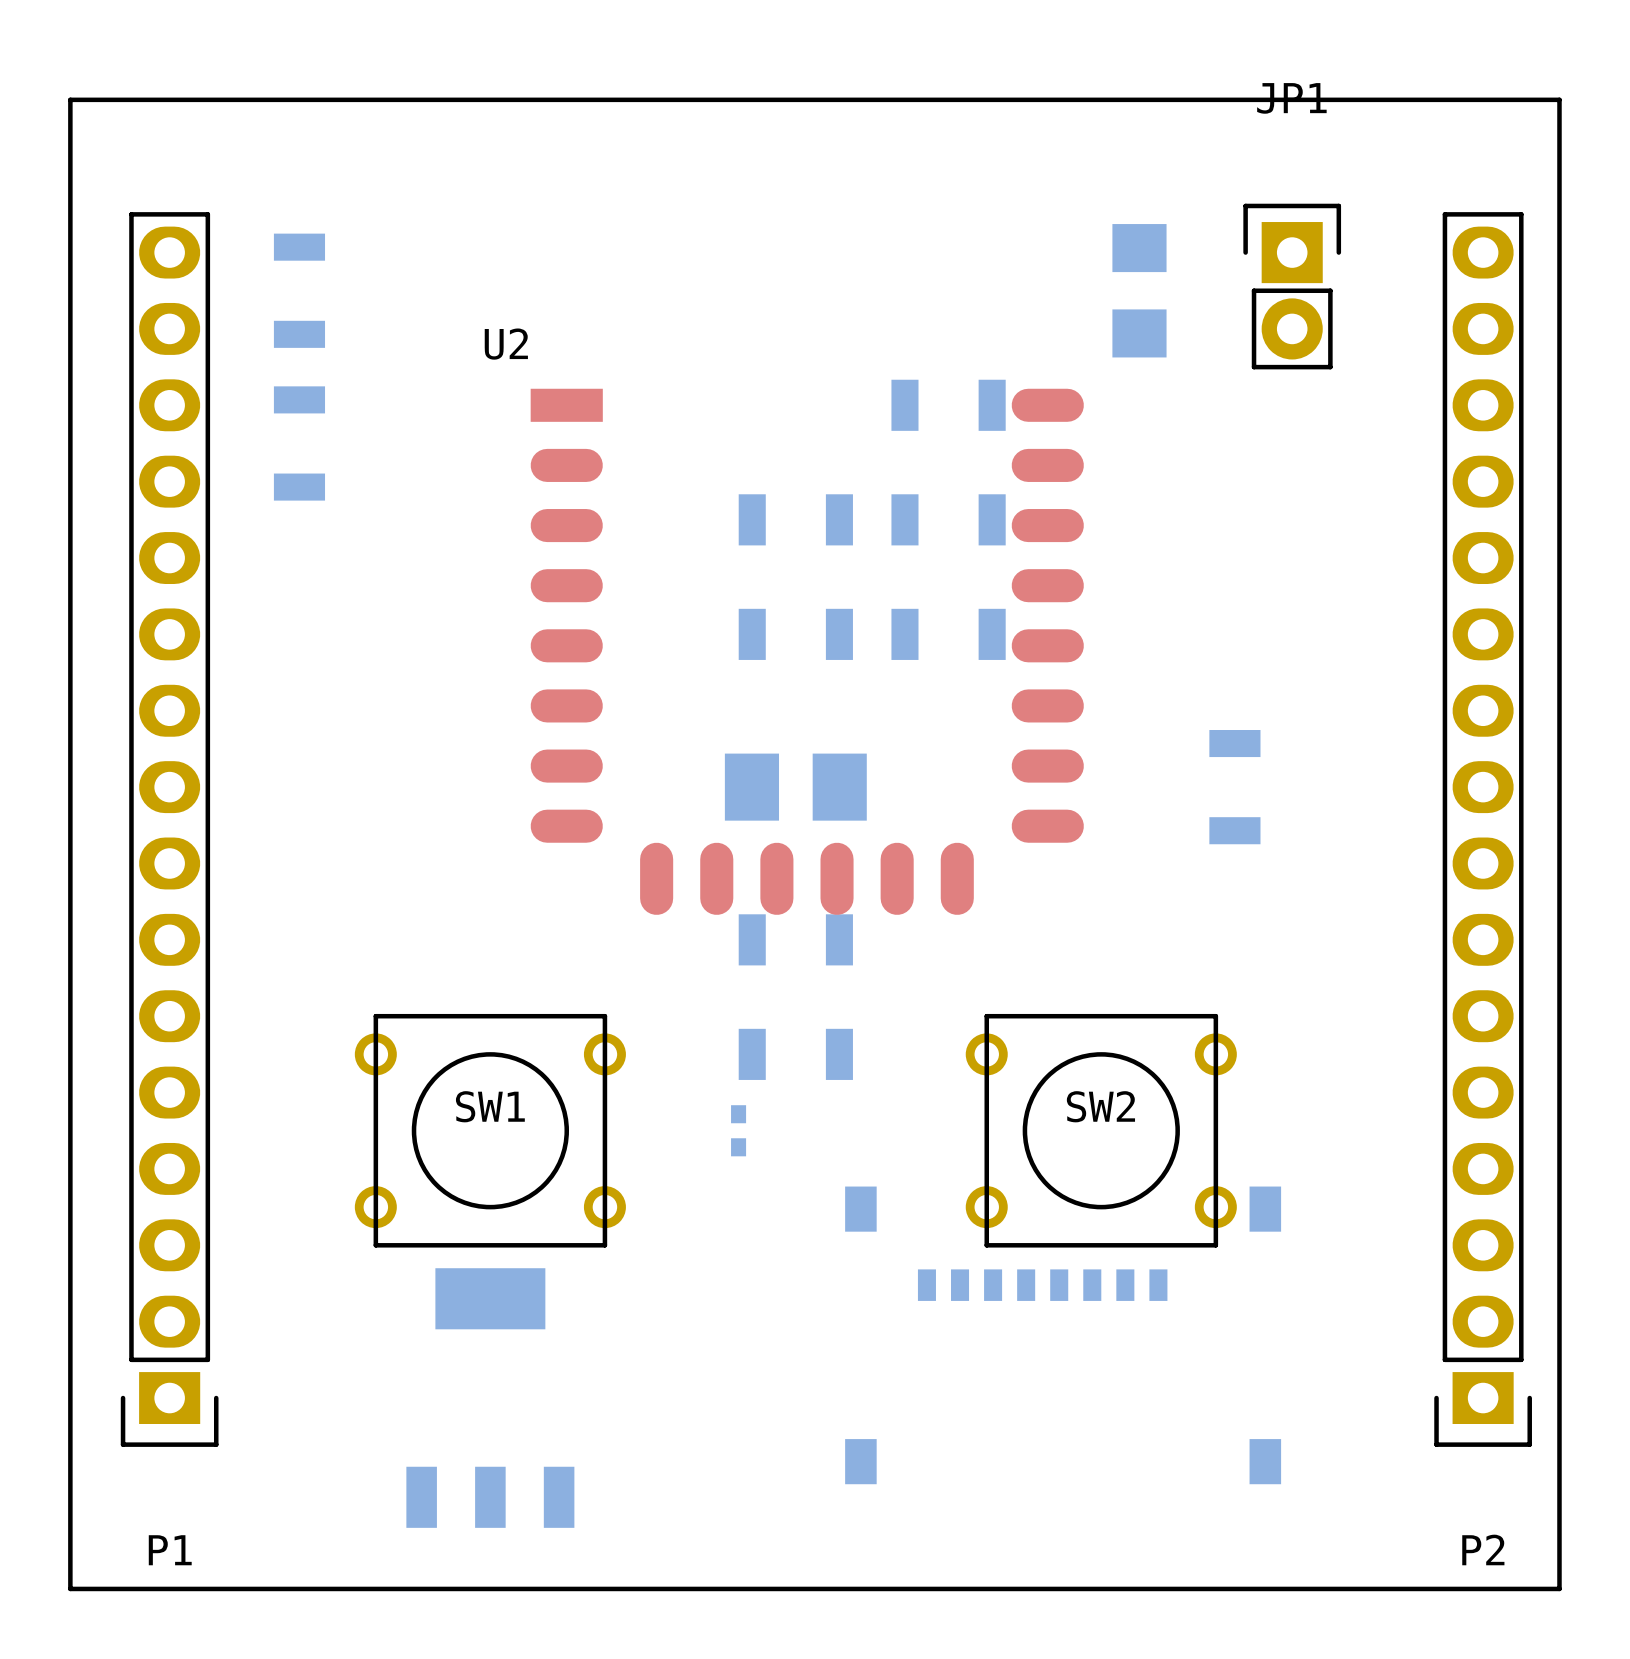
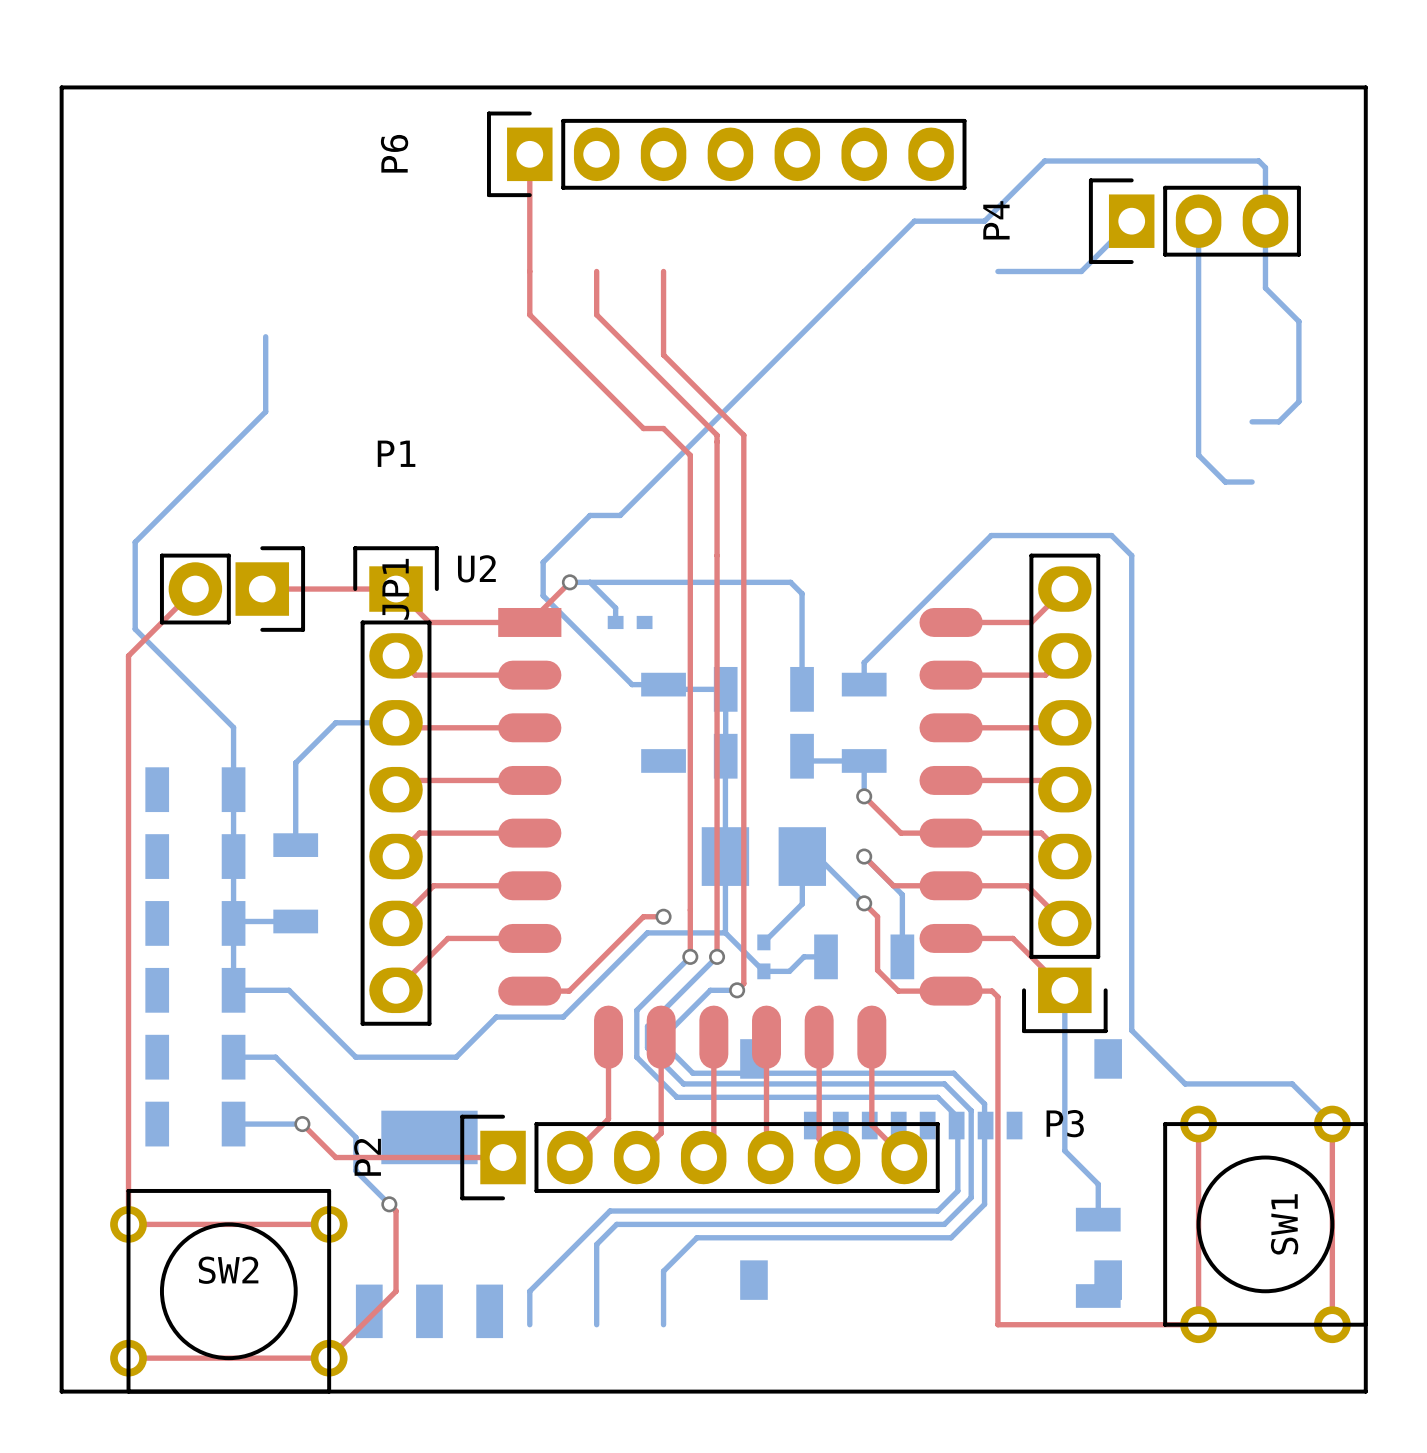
top track: none -> (529, 154) (529, 314) (643, 428) (663, 428) (690, 455) (690, 956)
P6: none -> (726, 154)
P1 footprint: [120, 212, 219, 1447] -> [353, 546, 439, 1026]
P2 footprint: [1434, 212, 1532, 1447] -> [460, 1114, 940, 1201]
bottom track: none -> (1131, 221) (1081, 271) (997, 271)
P4: none -> (1194, 221)
bottom track: none -> (1198, 221) (1198, 455) (1225, 482) (1252, 482)
JP1 rotation: 0° (1292, 286) -> 90° clockwise (232, 589)
JP1 position: (1292, 286) -> (232, 589)
part: (299, 290) -> none
part: (1139, 290) -> none
top track: none -> (596, 271) (596, 314) (717, 435) (717, 956)
top track: none -> (663, 271) (663, 354) (743, 435) (743, 983) (737, 990)
bottom track: none -> (265, 336) (265, 411) (135, 542) (135, 629) (233, 727) (233, 990) (289, 990) (355, 1057) (456, 1057) (496, 1017) (563, 1017) (647, 932) (725, 932)
part: (948, 405) -> none
part: (299, 443) -> none
bottom track: none -> (1252, 421) (1278, 421) (1298, 401) (1298, 321) (1265, 288) (1265, 167) (1258, 161) (1044, 161) (984, 221) (914, 221) (620, 515) (589, 515) (543, 562) (543, 595) (632, 684) (663, 684) (668, 689) (725, 689) (725, 756)
part: (795, 519) -> none
part: (948, 519) -> none
part: (795, 634) -> none
part: (948, 634) -> none
U2 position: (807, 651) -> (740, 838)
bottom track: none -> (569, 582) (790, 582) (802, 593) (802, 689)
top track: none -> (569, 582) (529, 622) (429, 622) (396, 589) (262, 589)
via: none -> (569, 582)
bottom track: none -> (589, 582) (615, 607) (615, 622)
top track: none -> (195, 589) (128, 655) (128, 1224) (329, 1224)
top track: none -> (1064, 589) (1031, 622) (951, 622)
part: none -> (630, 622)
top track: none -> (396, 655) (415, 675) (529, 675)
top track: none -> (1064, 655) (1045, 675) (951, 675)
bottom track: none -> (864, 684) (864, 662) (991, 535) (1111, 535) (1131, 555) (1131, 1030) (1185, 1083) (1292, 1083) (1332, 1124)
part position: (795, 787) -> (763, 856)
part: none -> (763, 689)
part: (1234, 787) -> none
bottom track: none -> (396, 722) (335, 722) (295, 762) (295, 845)
top track: none -> (396, 722) (401, 727) (529, 727)
part: none -> (663, 722)
part: none -> (864, 722)
top track: none -> (1064, 722) (1059, 727) (951, 727)
bottom track: none -> (725, 756) (725, 932)
part: none -> (763, 756)
bottom track: none -> (802, 756) (806, 760) (864, 760) (864, 796)
top track: none -> (529, 780) (405, 780) (396, 789)
top track: none -> (951, 780) (1055, 780) (1064, 789)
part: none -> (195, 789)
P3: none -> (1064, 793)
top track: none -> (864, 796) (900, 833) (1041, 833) (1064, 856)
via: none -> (864, 796)
part: (795, 939) -> none
top track: none -> (529, 833) (419, 833) (396, 856)
part: none -> (195, 856)
bottom track: none -> (864, 856) (902, 894) (902, 956)
top track: none -> (864, 856) (893, 885) (1027, 885) (1064, 923)
via: none -> (864, 856)
part: none -> (295, 883)
top track: none -> (529, 885) (433, 885) (396, 923)
bottom track: none -> (864, 903) (817, 856) (802, 856) (802, 903) (763, 942)
top track: none -> (864, 903) (877, 916) (877, 970) (898, 991) (992, 991) (997, 997) (997, 1324) (1198, 1324) (1198, 1124)
via: none -> (864, 903)
top track: none -> (663, 916) (643, 916) (569, 991) (529, 991)
via: none -> (663, 916)
bottom track: none -> (295, 921) (235, 921) (233, 923)
part: none -> (195, 923)
part: (795, 1054) -> none
bottom track: none -> (725, 932) (763, 971) (789, 971) (804, 956) (826, 956)
top track: none -> (529, 938) (447, 938) (396, 990)
top track: none -> (951, 938) (1012, 938) (1064, 990)
bottom track: none -> (690, 956) (636, 1010) (636, 1057) (676, 1097) (937, 1097) (957, 1117) (957, 1190) (937, 1211) (610, 1211) (529, 1291) (529, 1324)
via: none -> (690, 956)
bottom track: none -> (717, 956) (647, 1026) (647, 1047) (683, 1083) (944, 1083) (971, 1110) (971, 1197) (944, 1224) (616, 1224) (596, 1244) (596, 1324)
via: none -> (717, 956)
part: none -> (864, 956)
part: none -> (195, 990)
SW1 rotation: 0° (490, 1130) -> 90° clockwise (1265, 1224)
SW1 position: (490, 1130) -> (1265, 1224)
part position: (738, 1130) -> (763, 956)
bottom track: none -> (737, 990) (710, 990) (670, 1030) (670, 1050) (692, 1073) (953, 1073) (984, 1104) (984, 1204) (951, 1237) (696, 1237) (663, 1271) (663, 1324)
via: none -> (737, 990)
SW2 position: (1101, 1130) -> (228, 1291)
bottom track: none -> (1064, 990) (1064, 1150) (1098, 1184) (1098, 1219)
top track: none -> (608, 1037) (608, 1118) (569, 1157)
top track: none -> (661, 1037) (661, 1133) (636, 1157)
top track: none -> (713, 1037) (713, 1147) (703, 1157)
top track: none -> (766, 1037) (766, 1153) (770, 1157)
top track: none -> (819, 1037) (819, 1139) (837, 1157)
top track: none -> (871, 1037) (871, 1125) (904, 1157)
part: none -> (195, 1057)
bottom track: none -> (233, 1057) (275, 1057) (355, 1137) (355, 1170) (389, 1204)
part: none -> (195, 1124)
bottom track: none -> (233, 1124) (302, 1124)
top track: none -> (302, 1124) (335, 1157) (503, 1157)
via: none -> (302, 1124)
top track: none -> (1332, 1124) (1332, 1324)
top track: none -> (389, 1204) (396, 1211) (396, 1291) (329, 1358) (128, 1358)
via: none -> (389, 1204)
part: none -> (1098, 1257)
P2 name position: P2 (1483, 1549) -> P2 (367, 1157)
P1 name position: P1 (170, 1550) -> P1 (396, 453)

